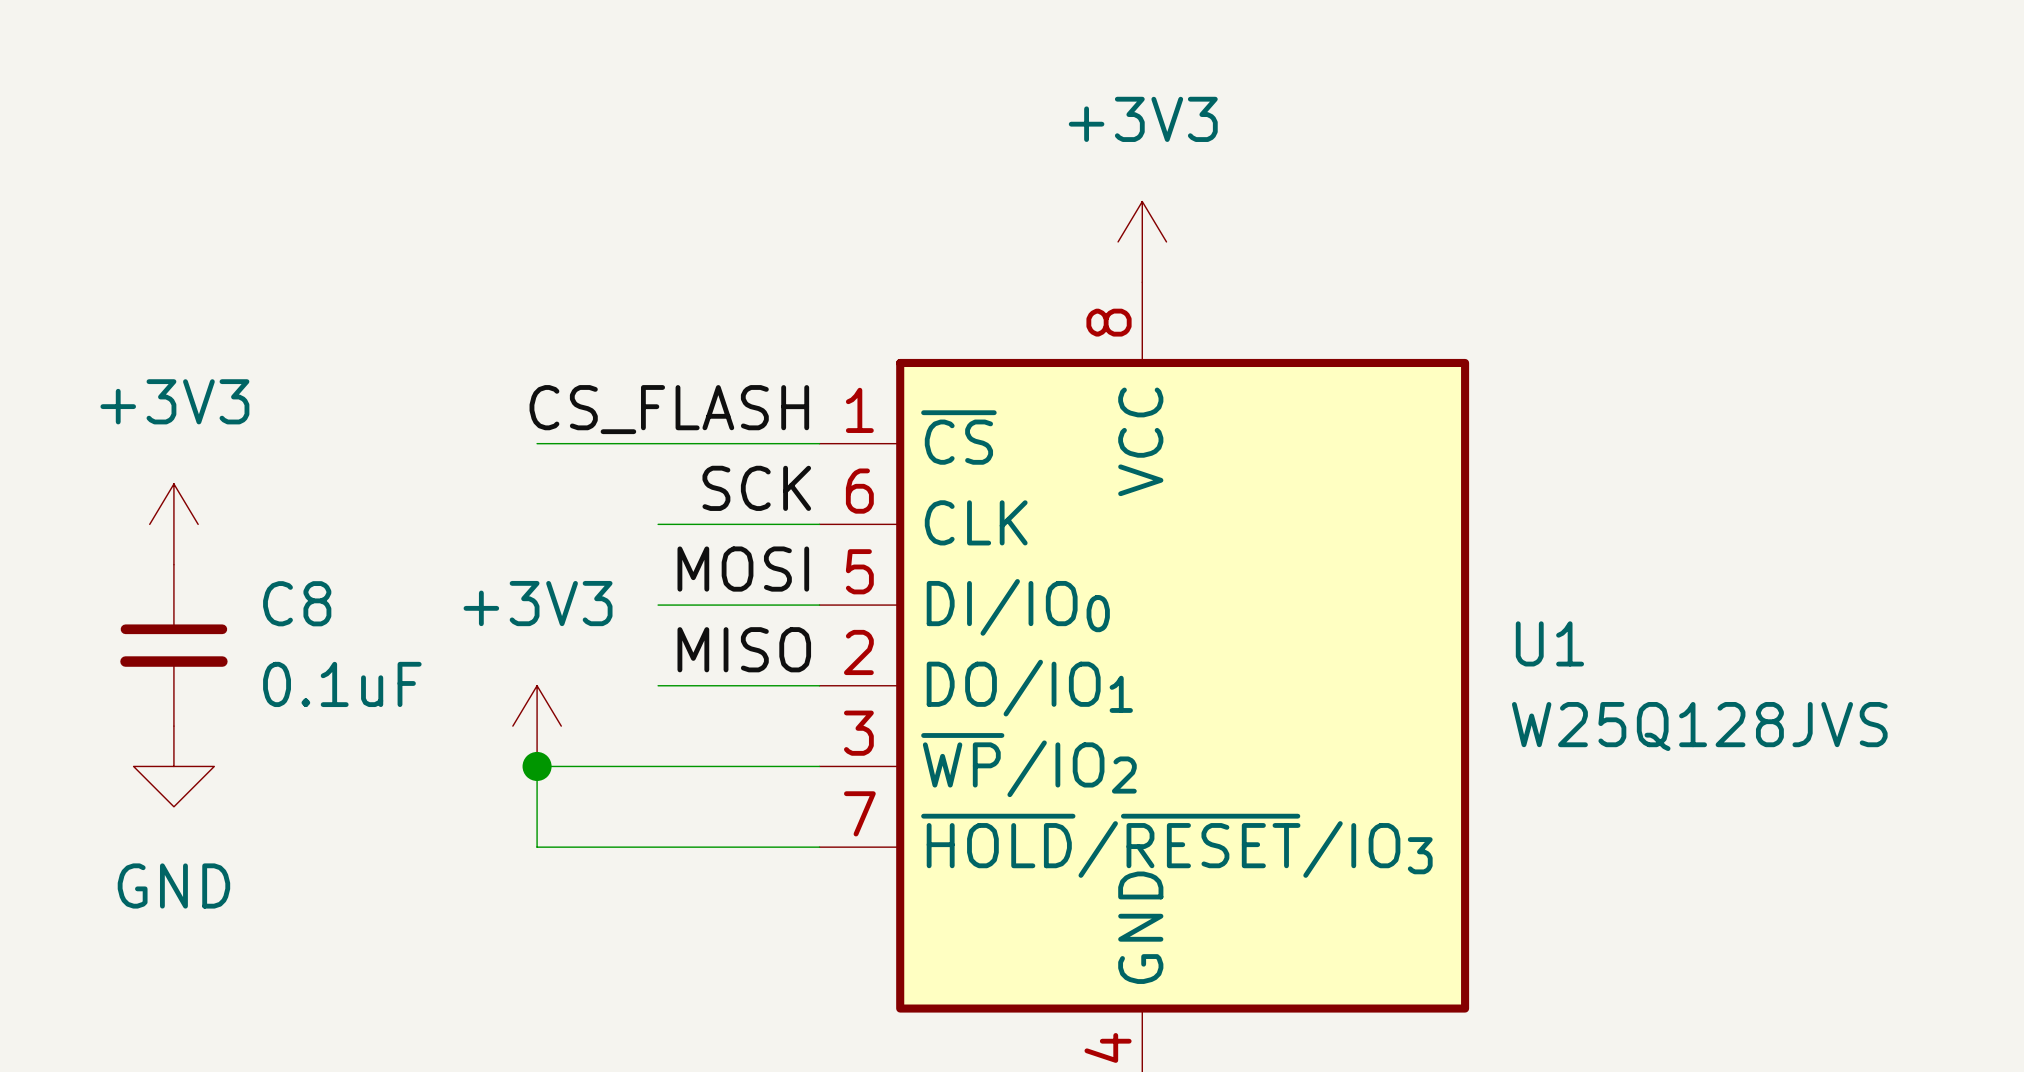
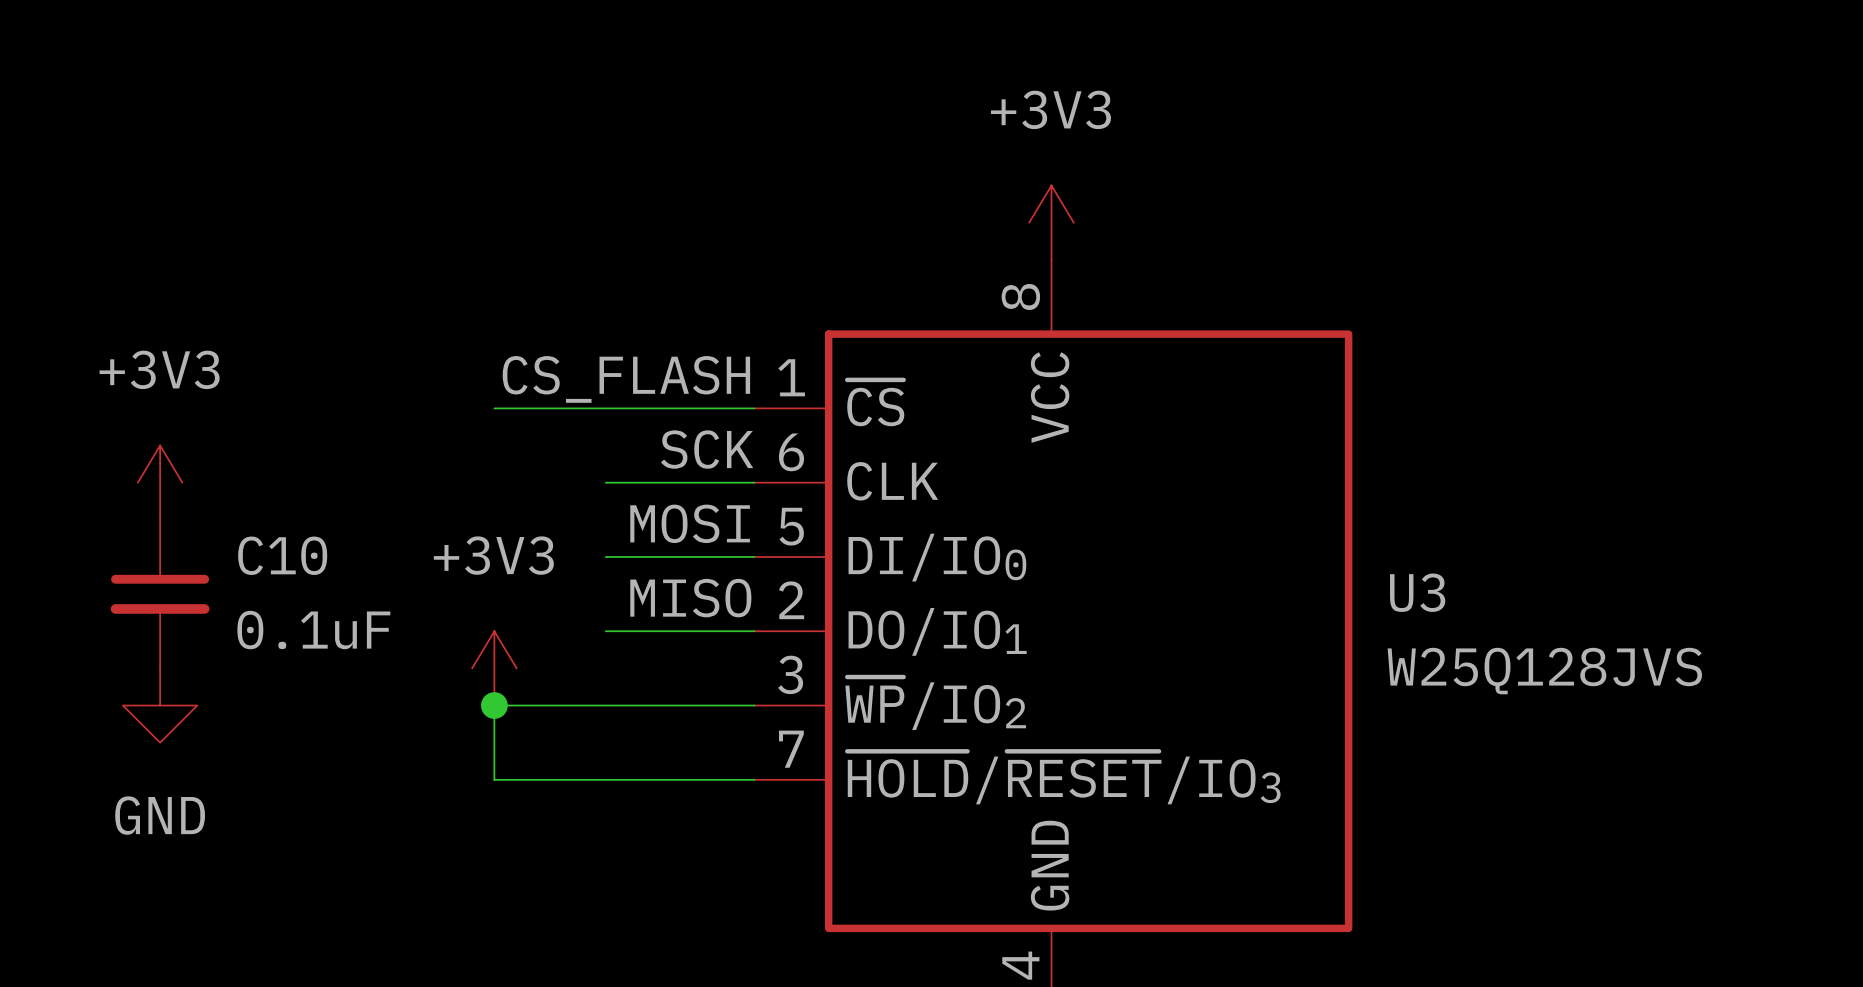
C8 name: C8 (297, 603) -> C10 (282, 555)
U1 name: U1 (1549, 643) -> U3 (1417, 592)

